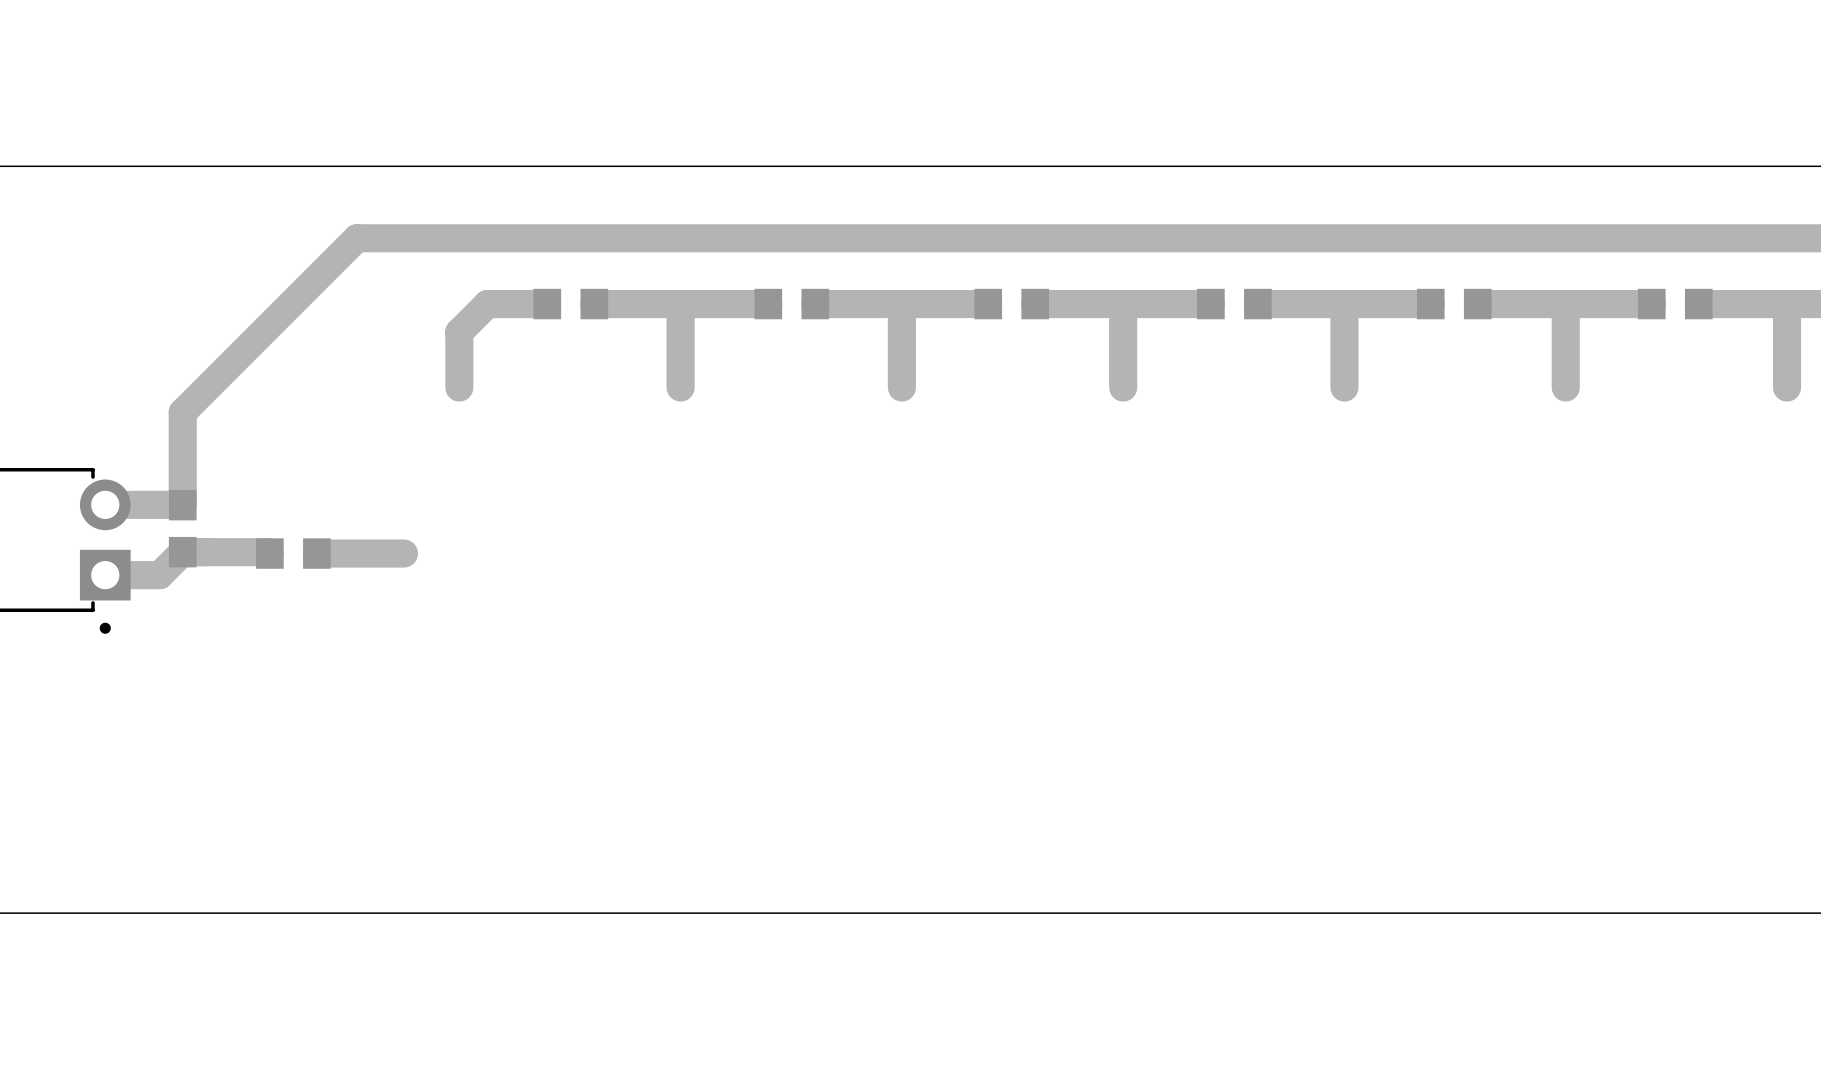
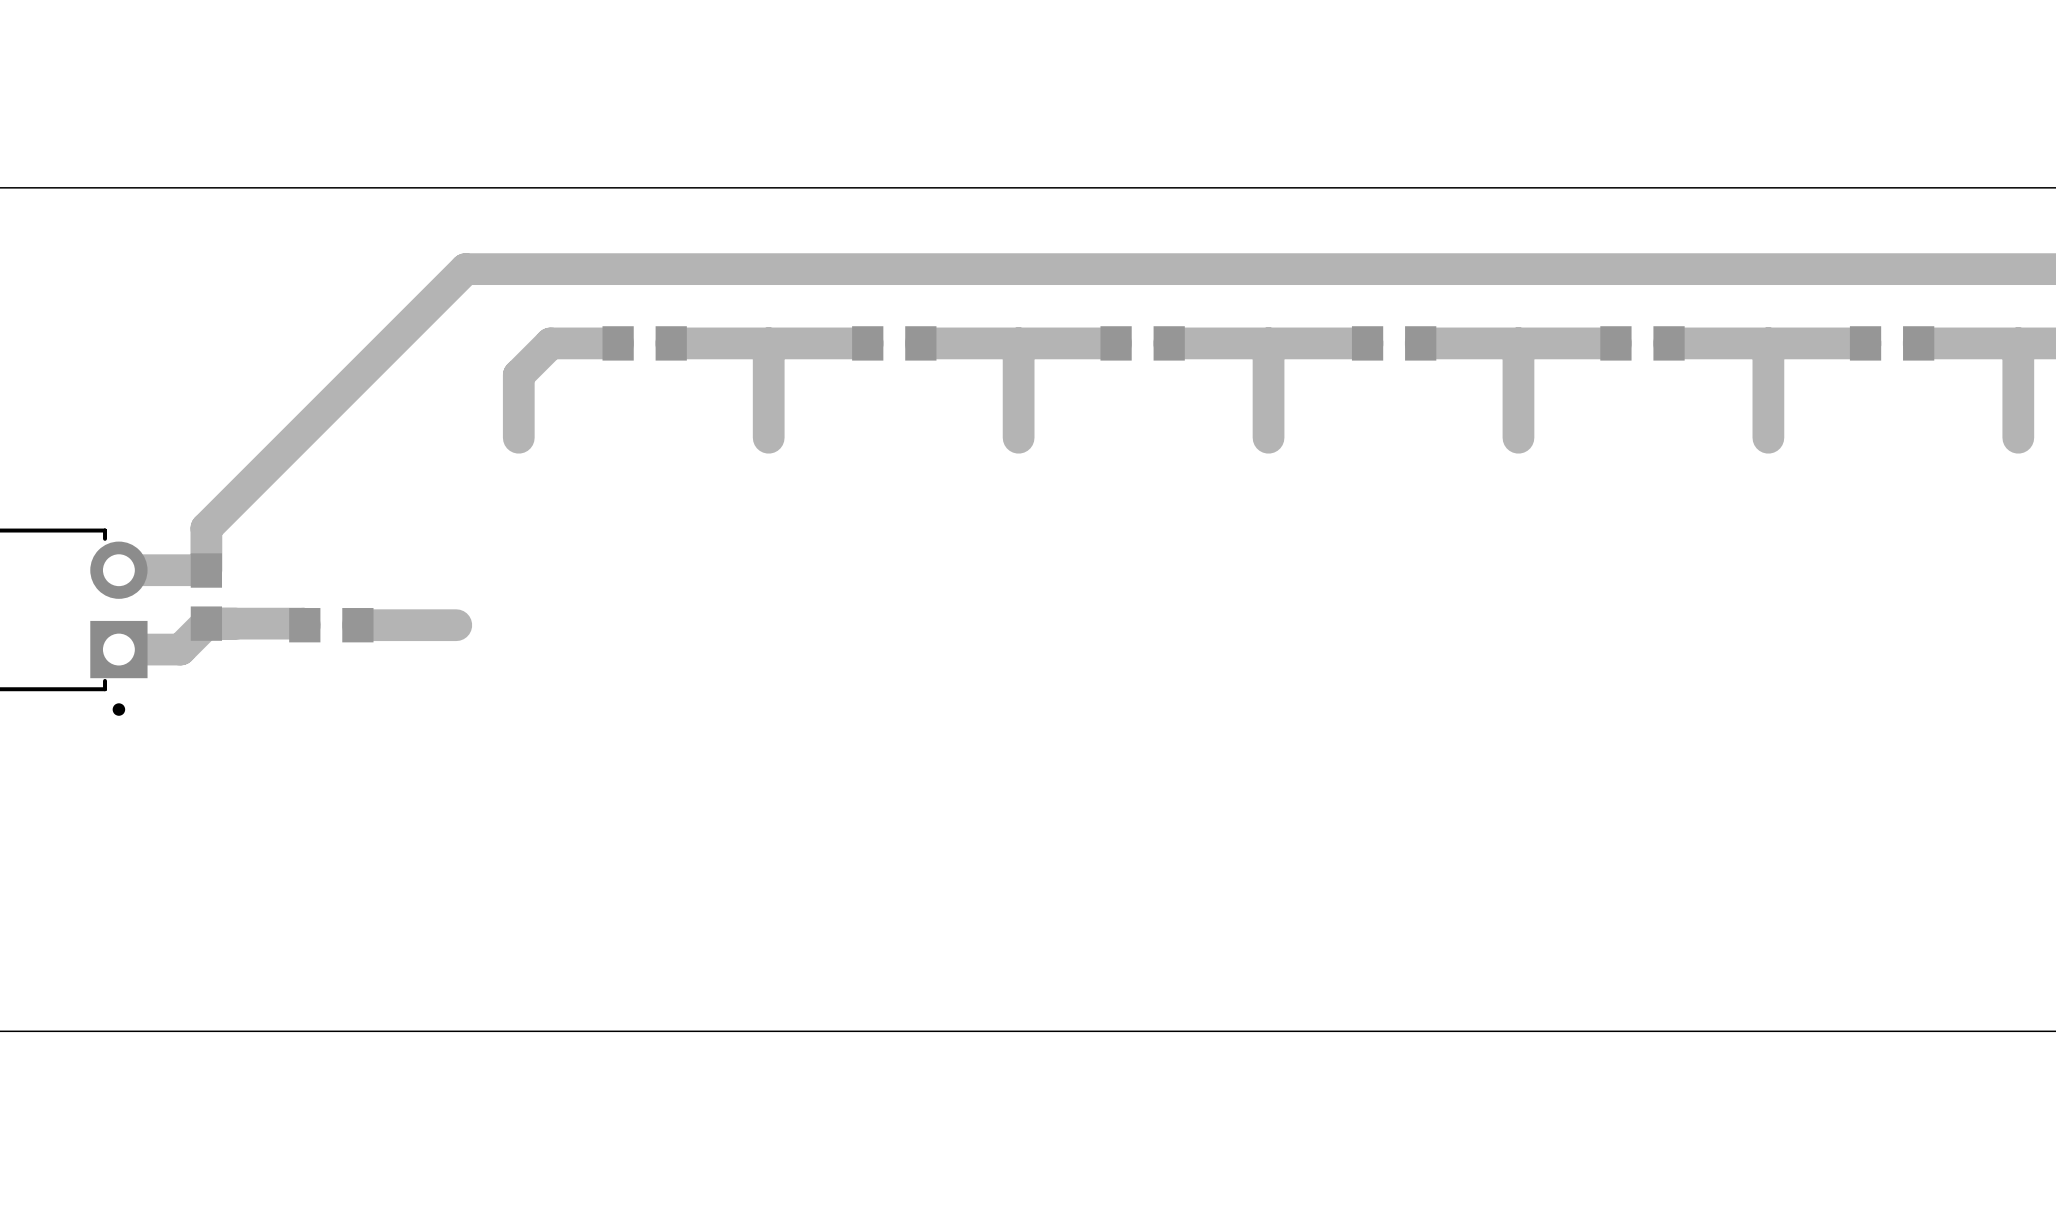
track: (412, 238) (356, 238) (182, 412) (182, 467) -> (465, 269) (206, 528)

